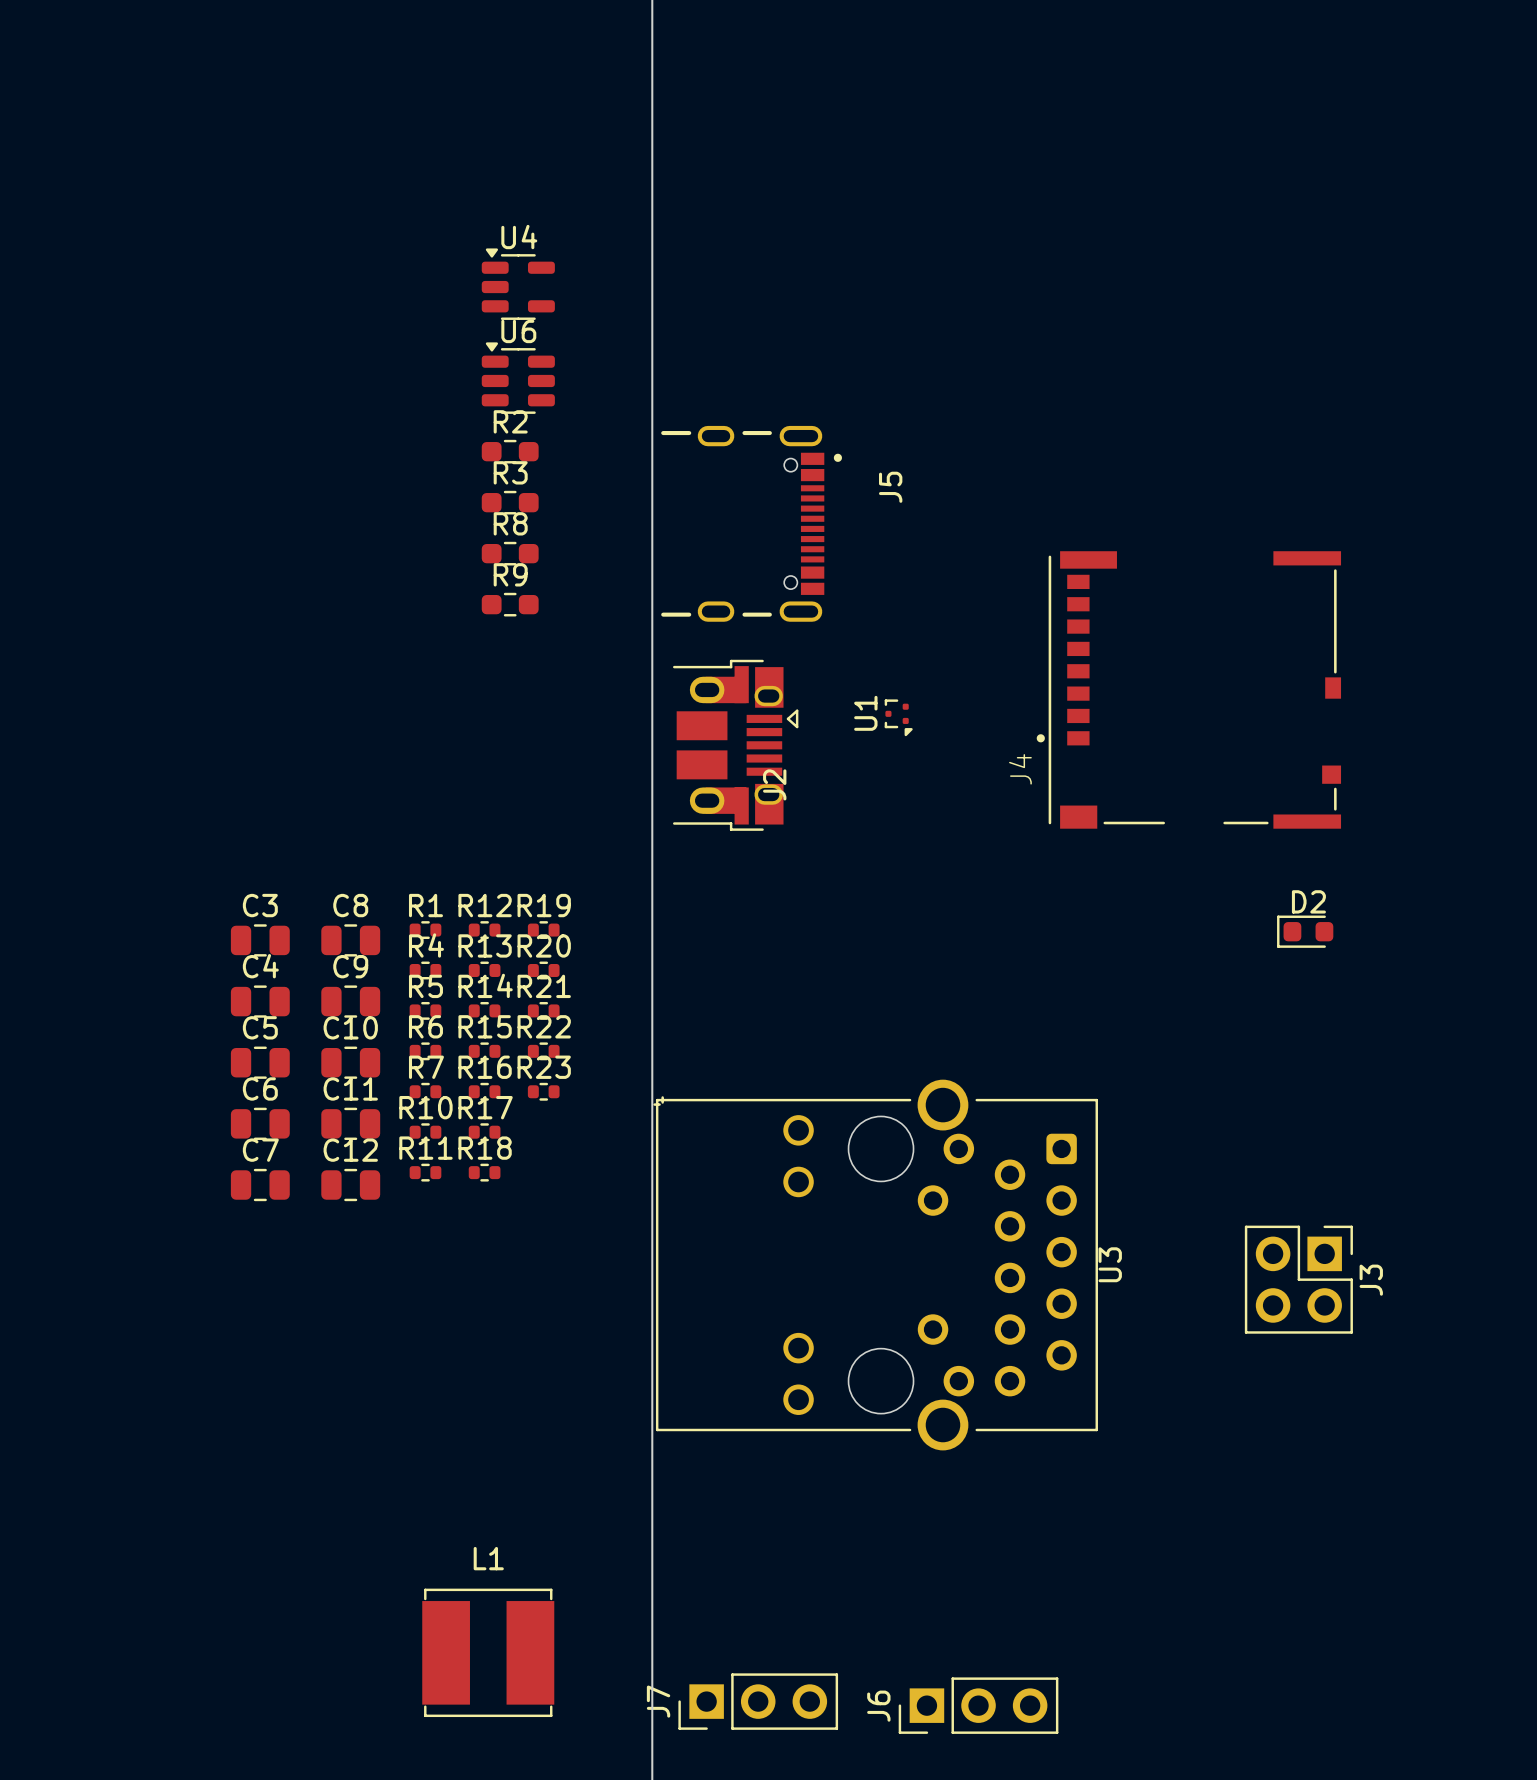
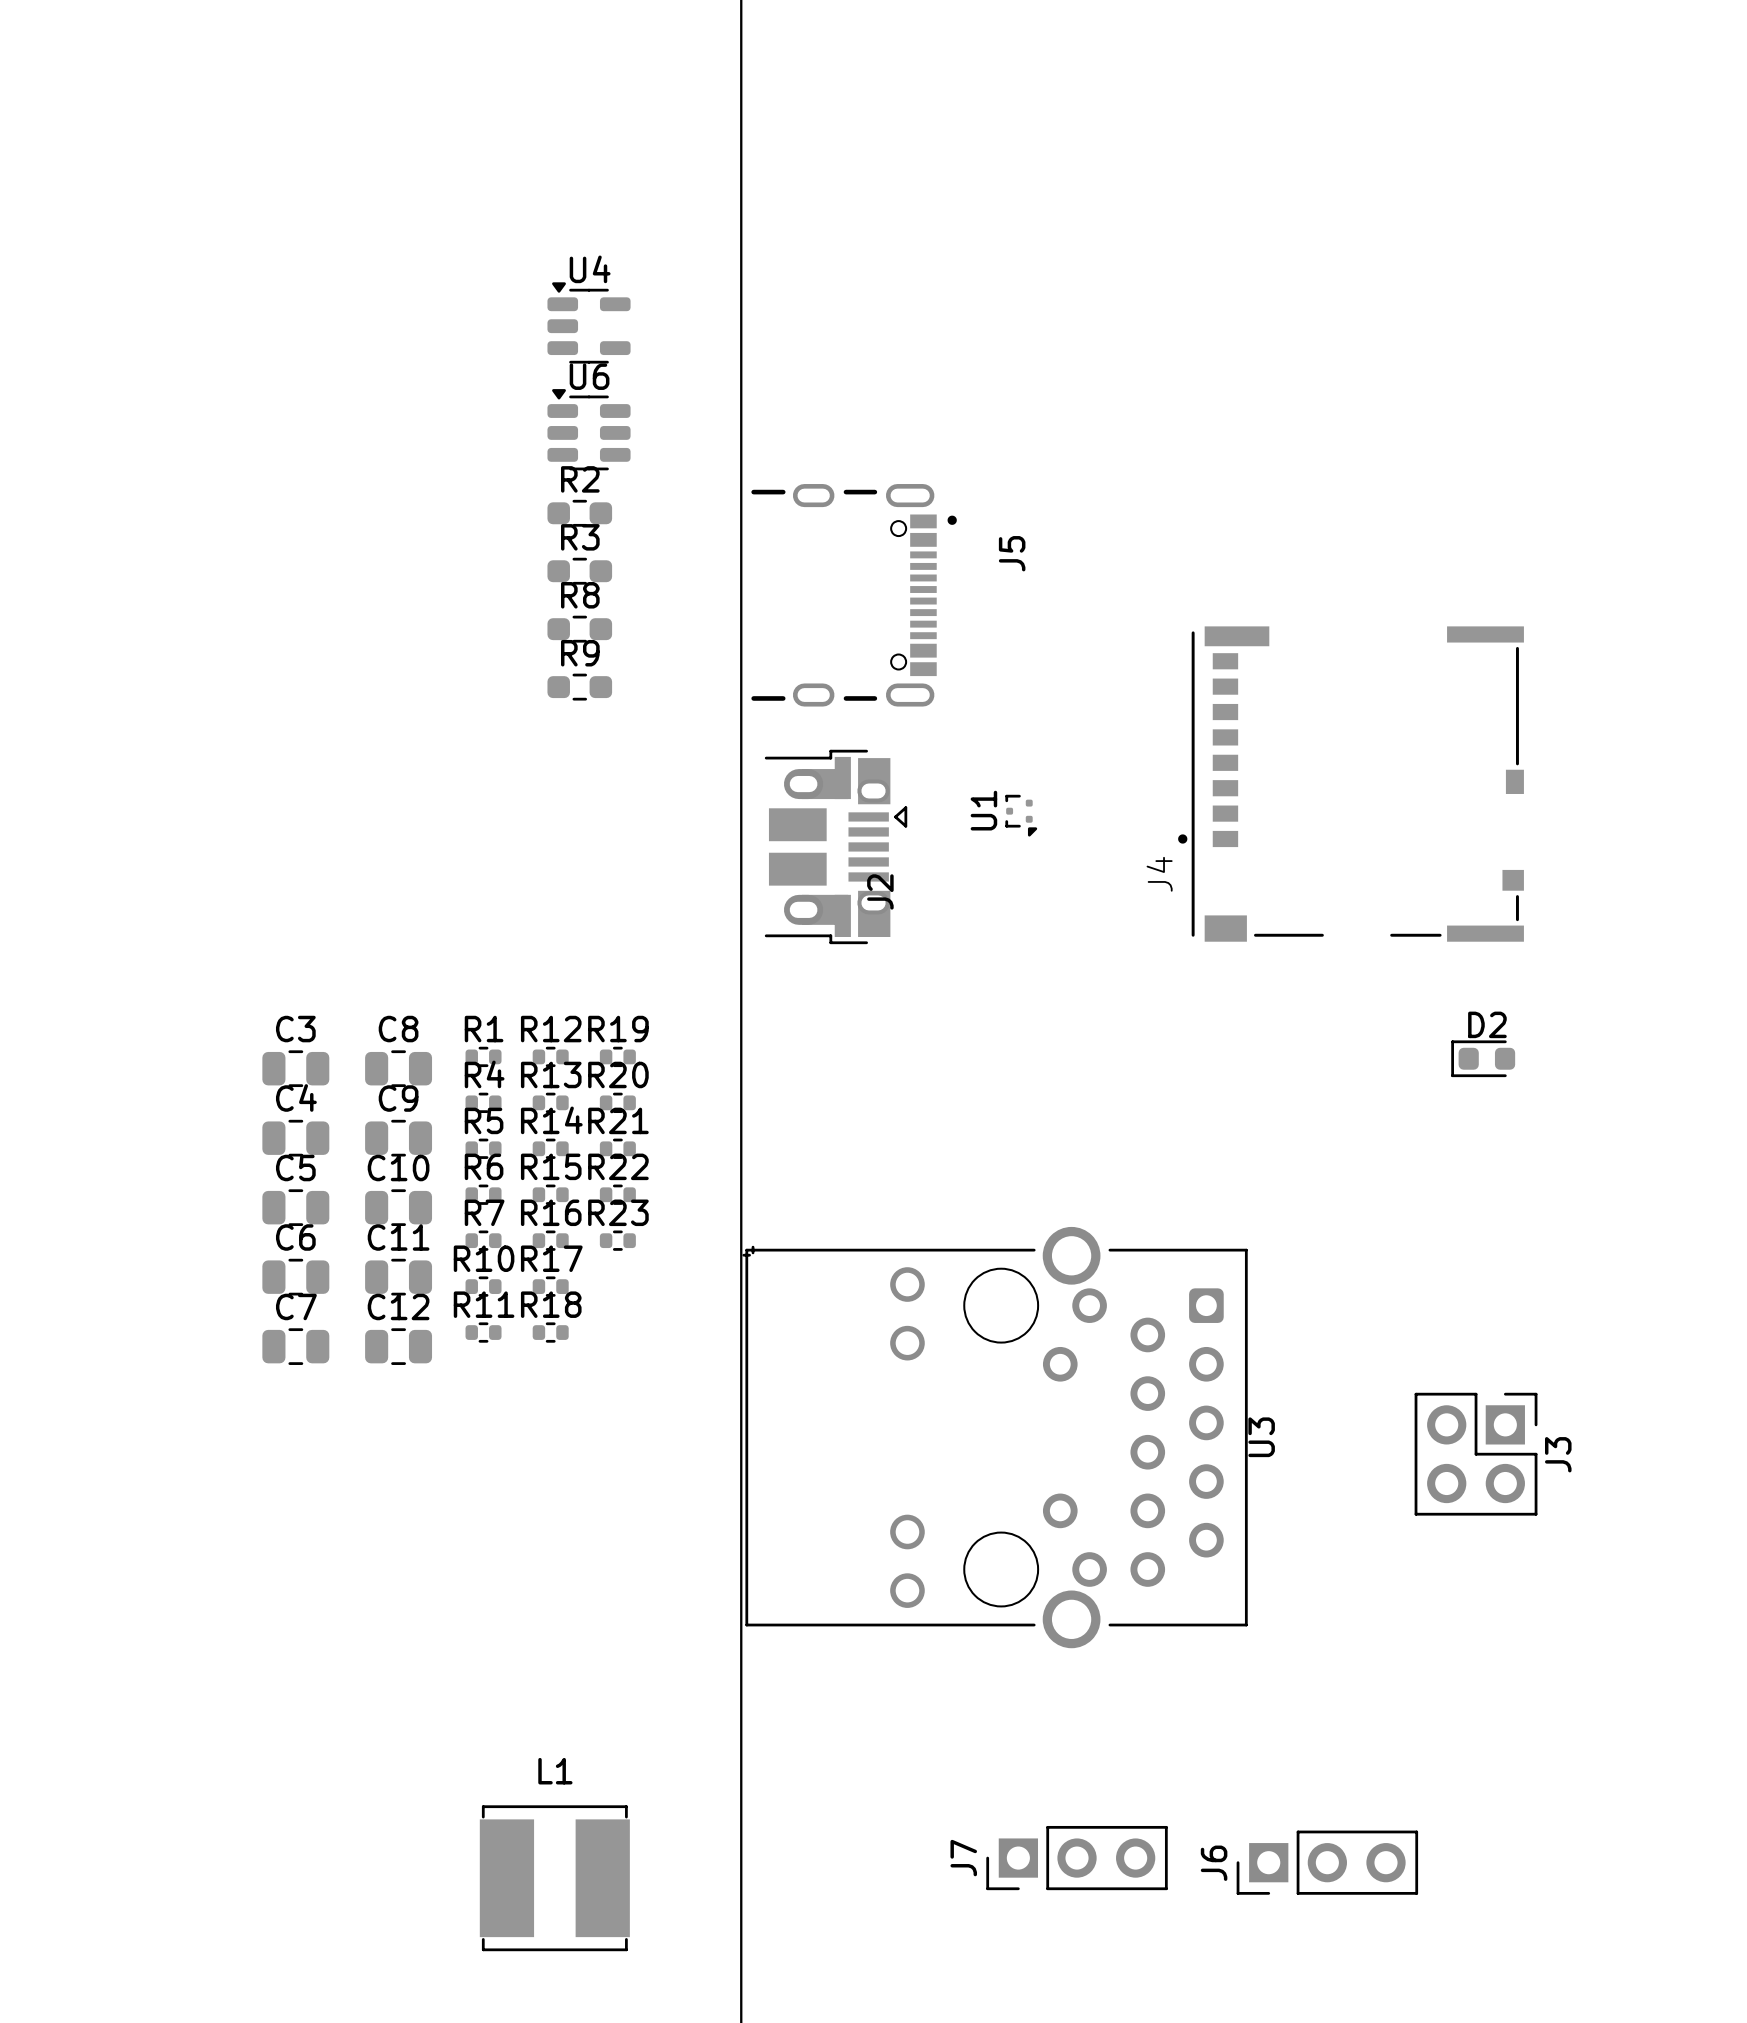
J7 position: (758, 1701) -> (1077, 1858)
J6 position: (978, 1705) -> (1327, 1862)

